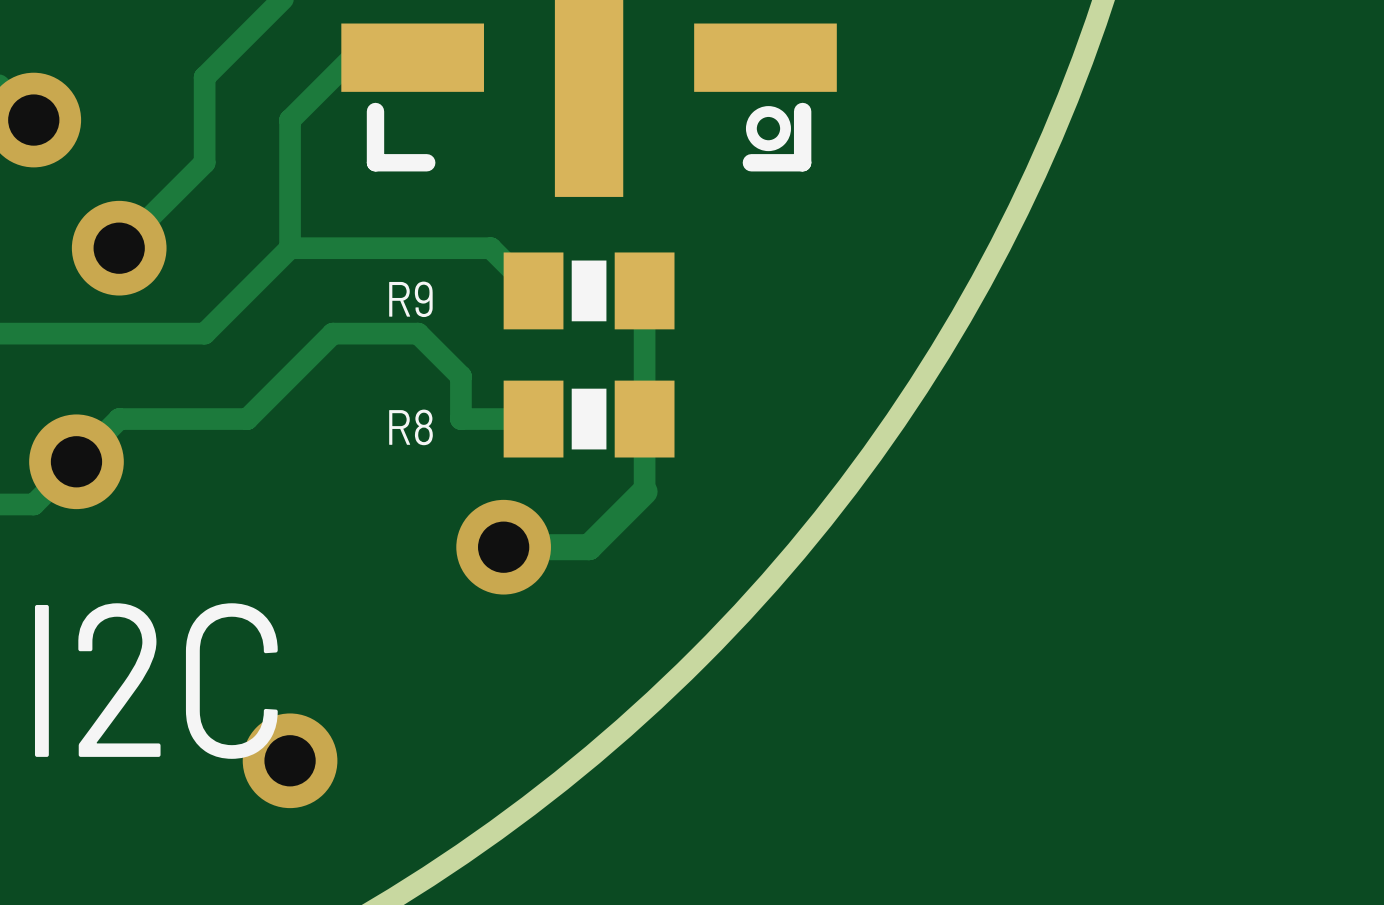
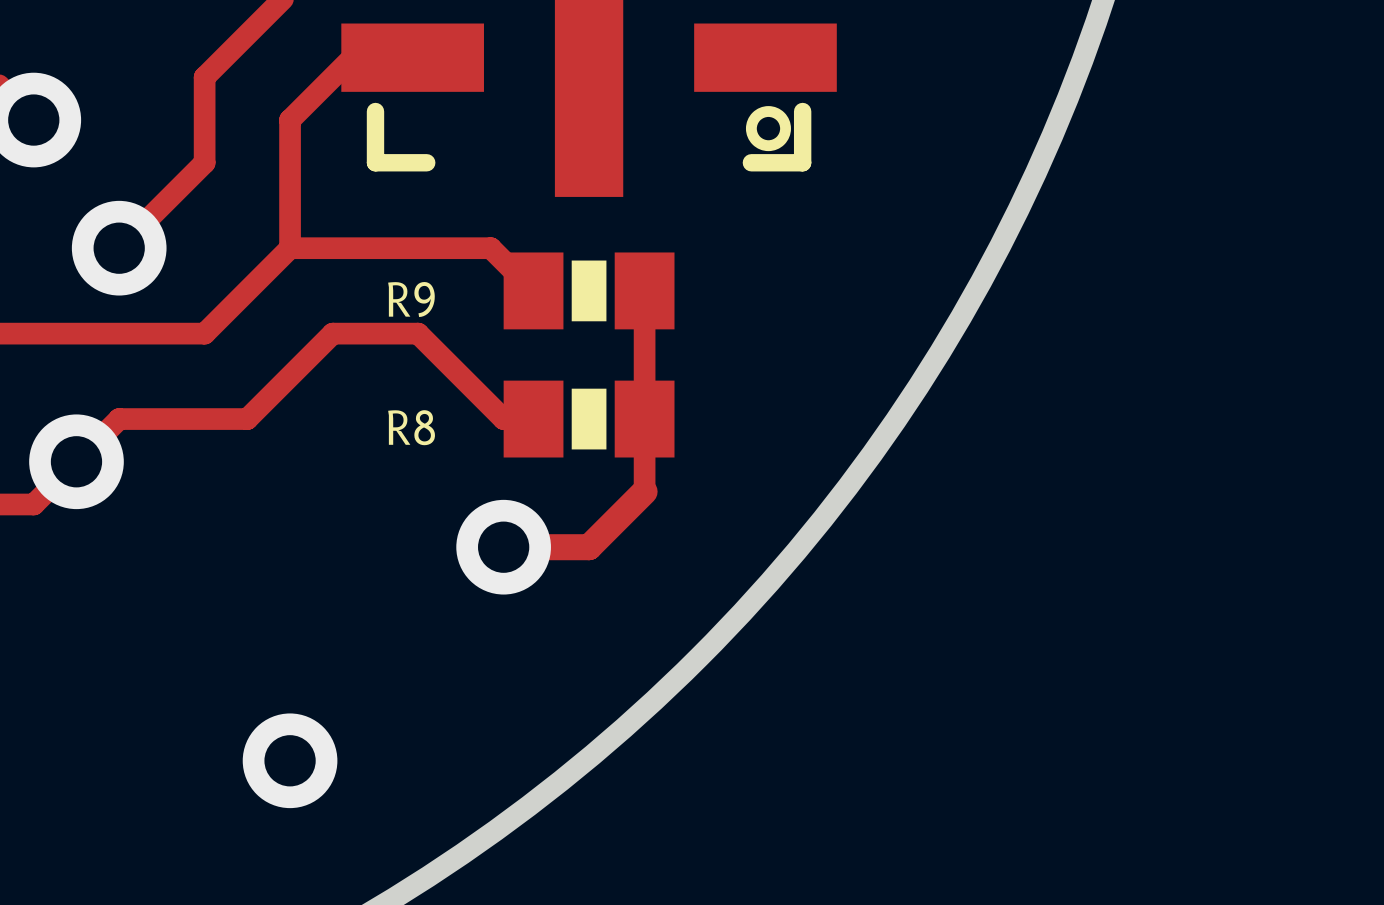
track: (460, 376) (460, 419) (503, 419) -> (460, 376) (503, 419)
text: I2C (156, 681) -> none

